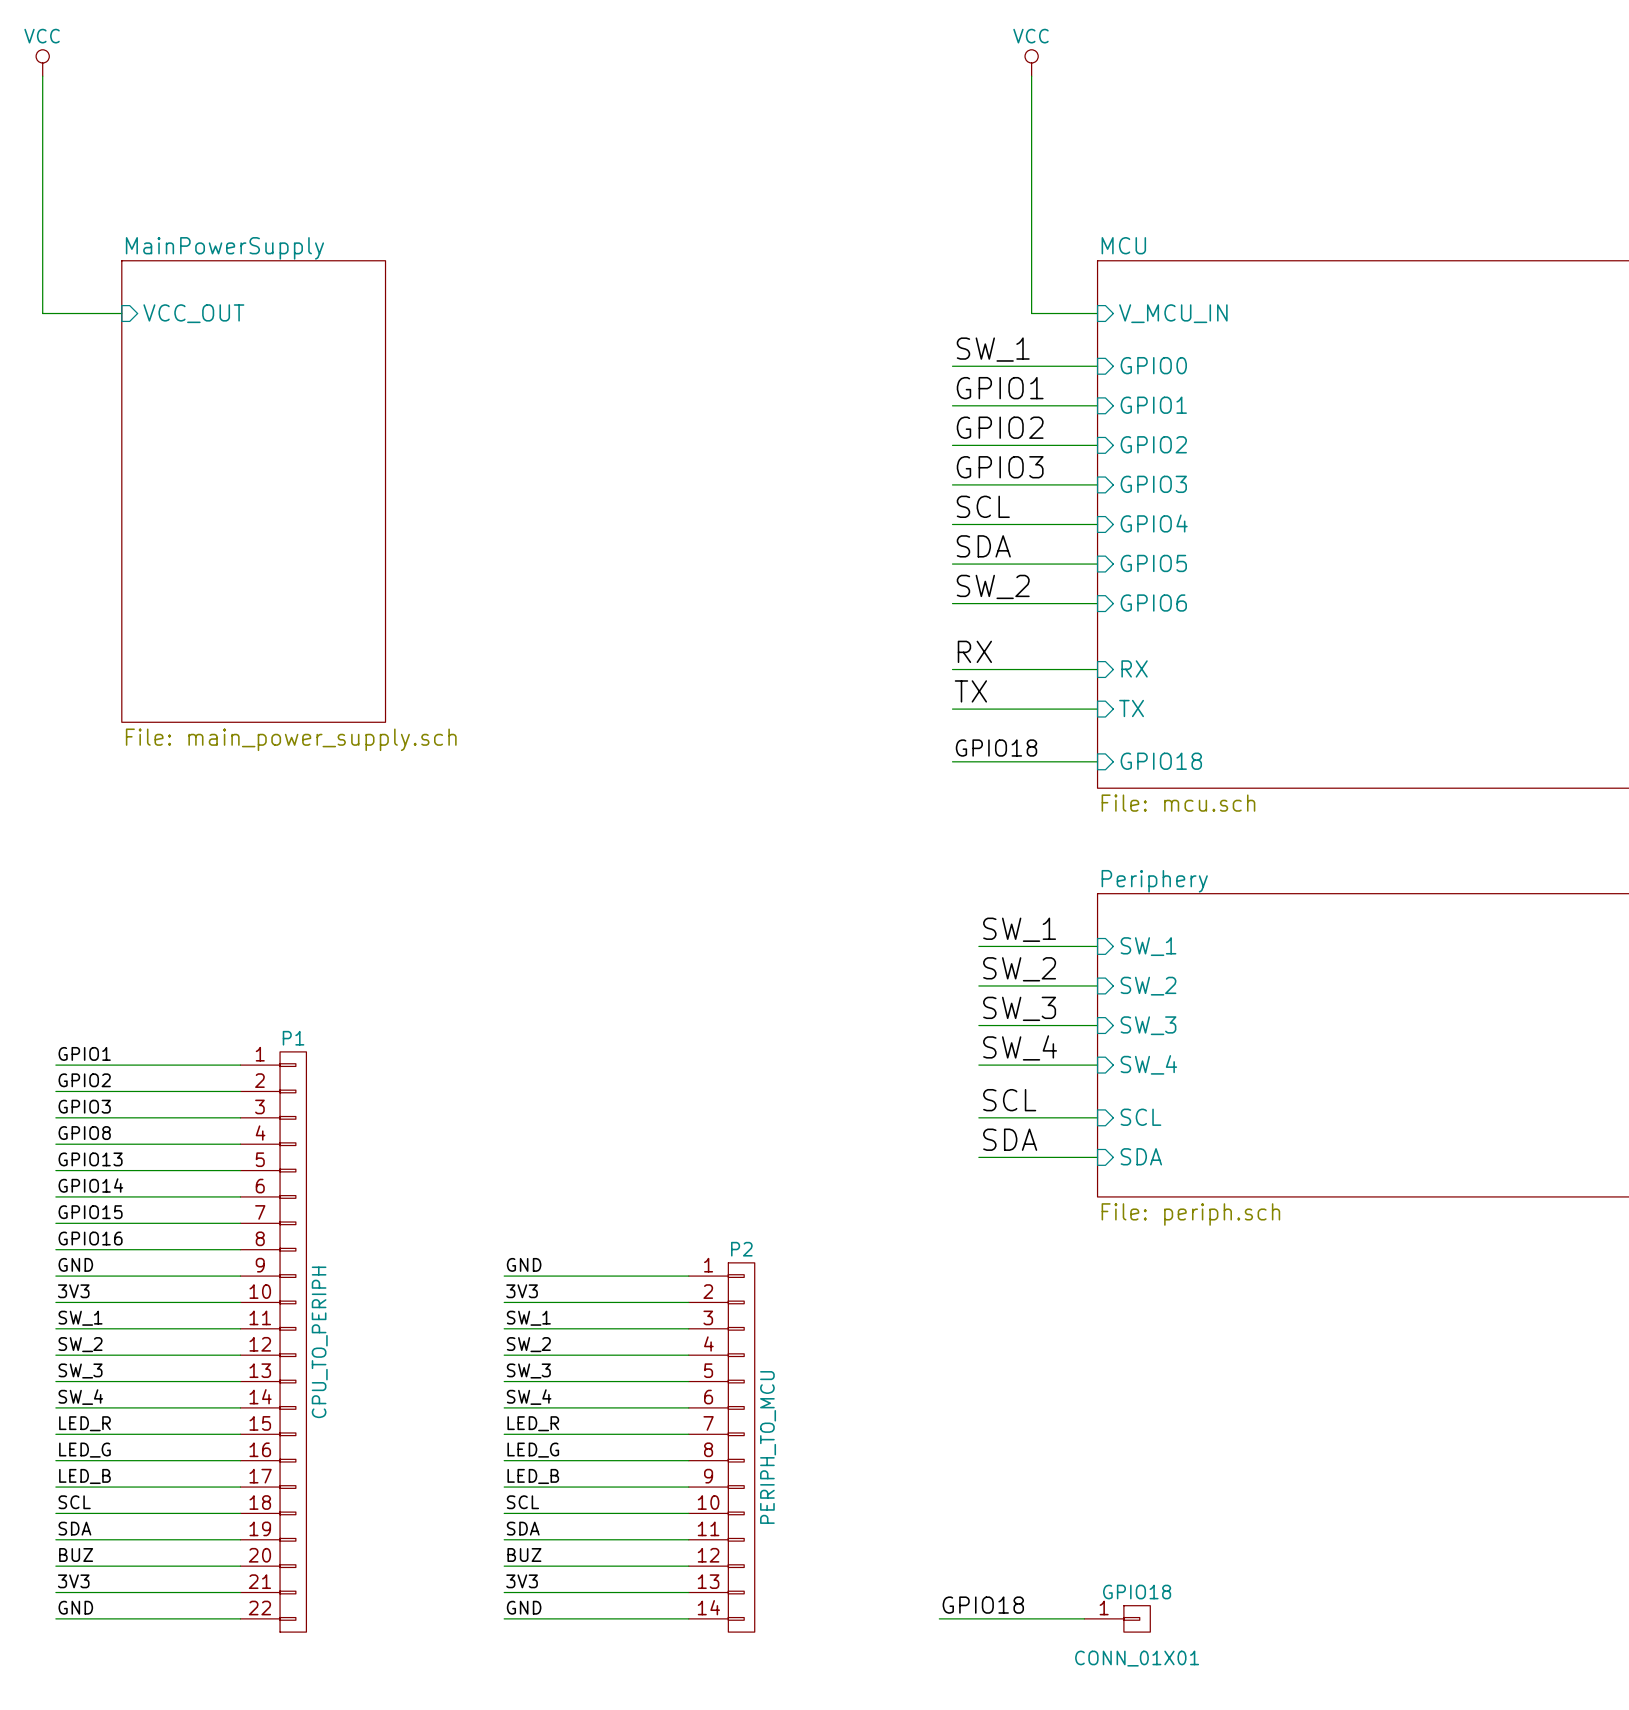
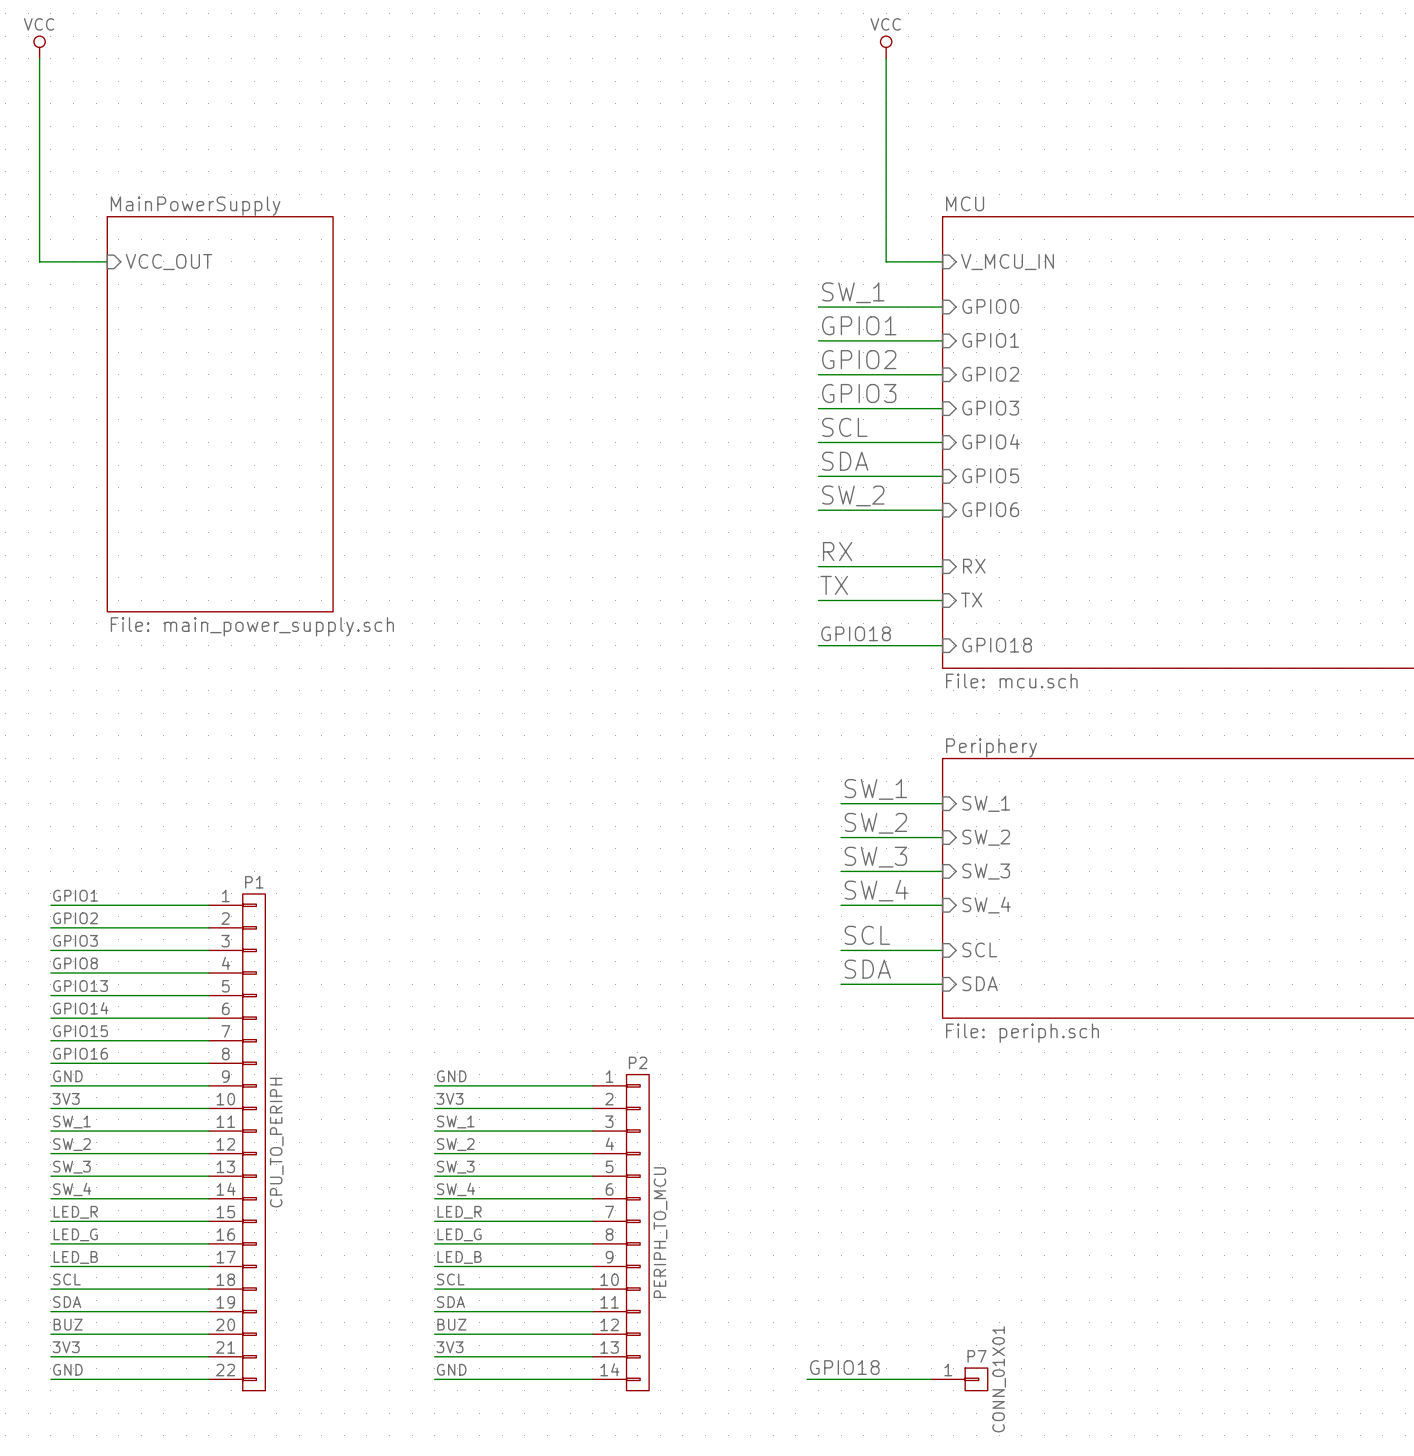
GPIO18 name: GPIO18 (1137, 1592) -> P7 (976, 1356)
GPIO18 value rotation: 0° (1137, 1658) -> 90° counterclockwise (999, 1379)

